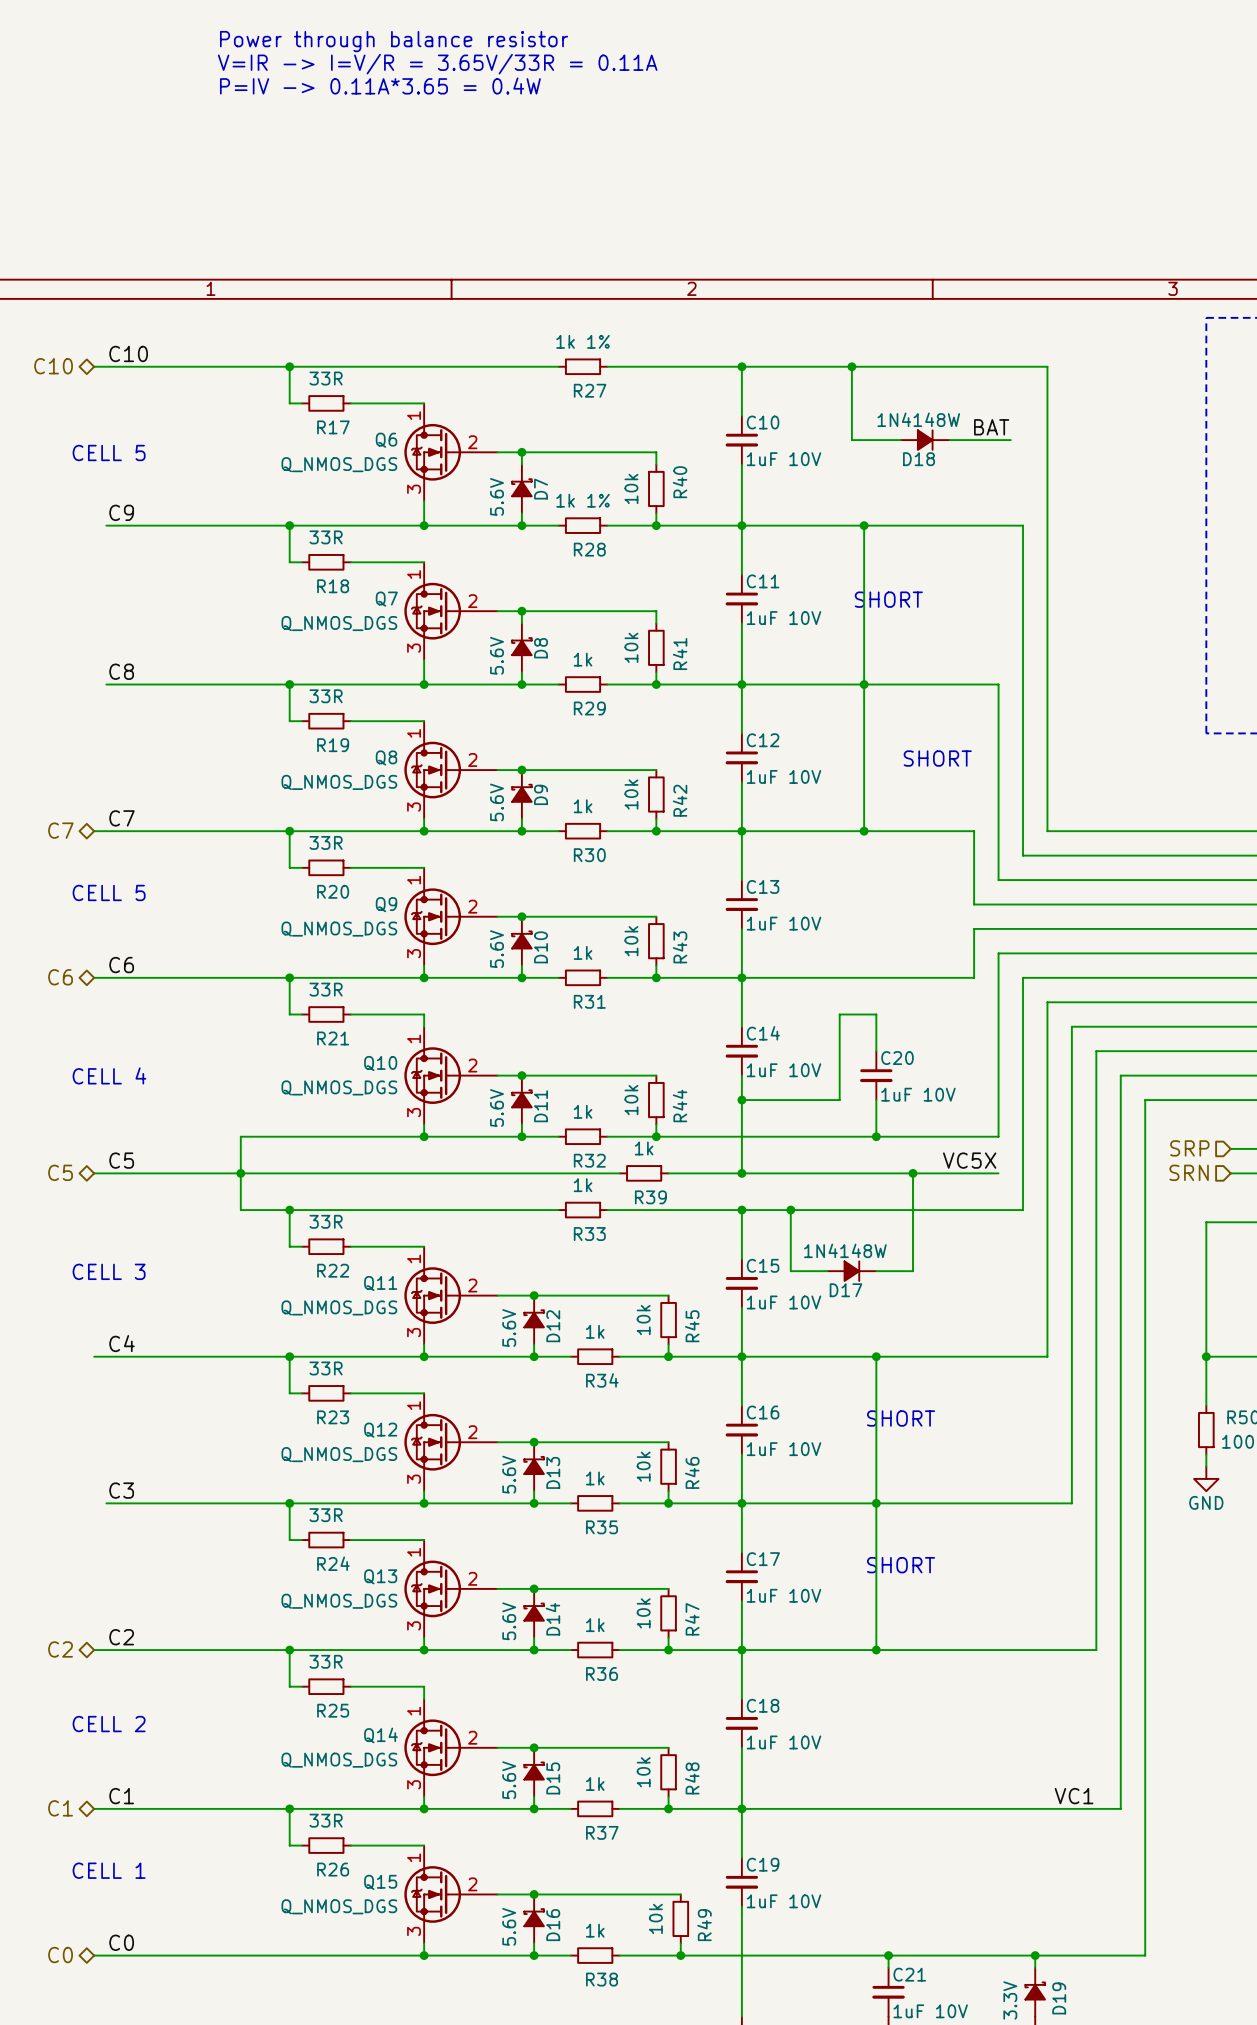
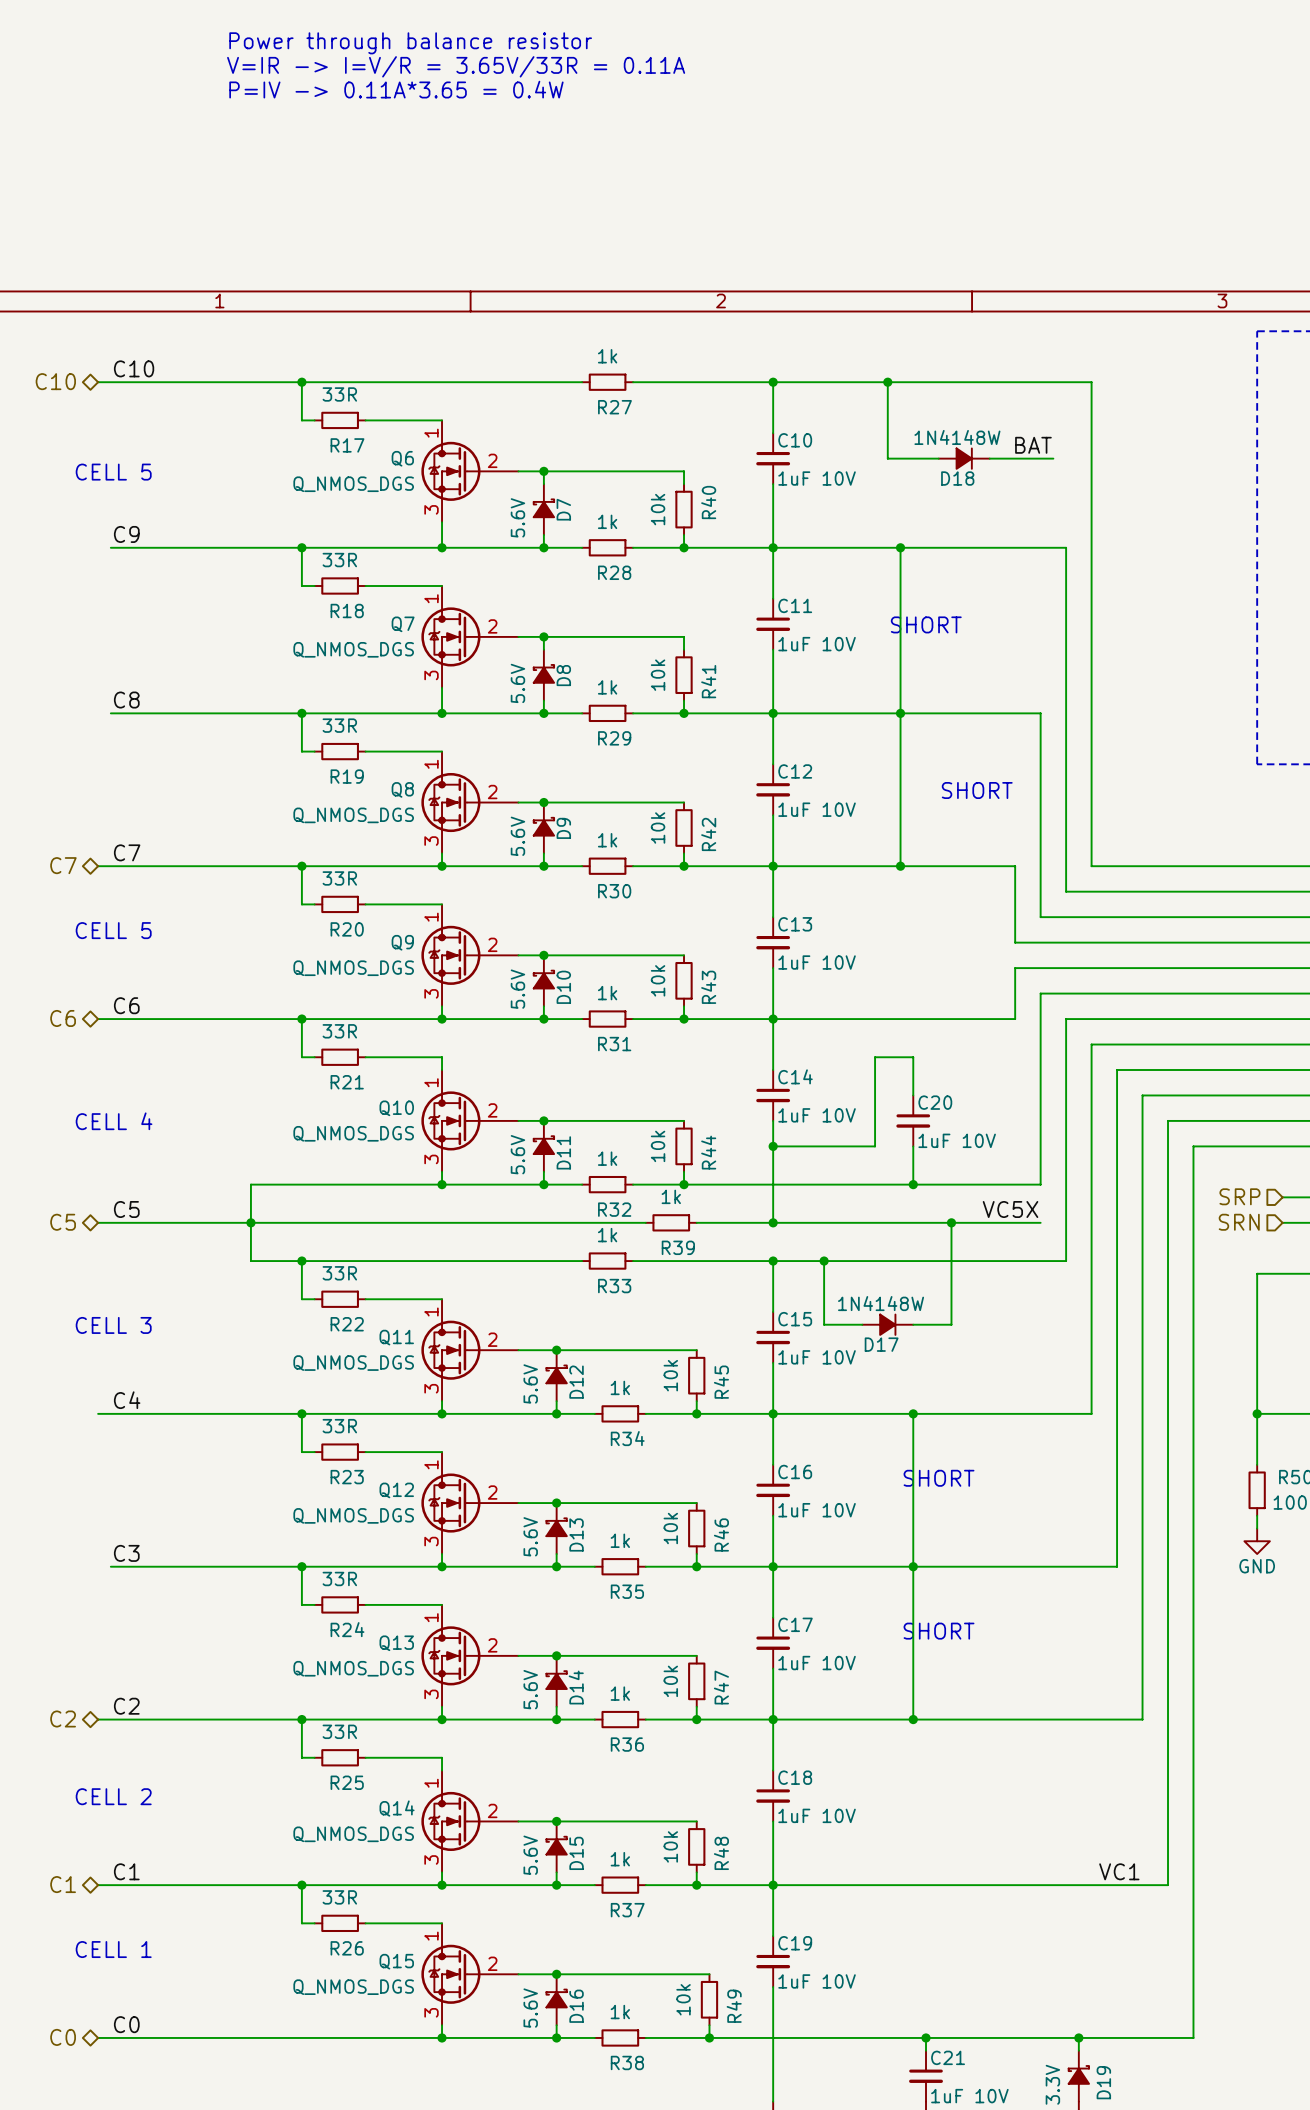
R27 value: 1k 1% (583, 341) -> 1k (607, 356)
R28 value: 1k 1% (583, 500) -> 1k (607, 521)

